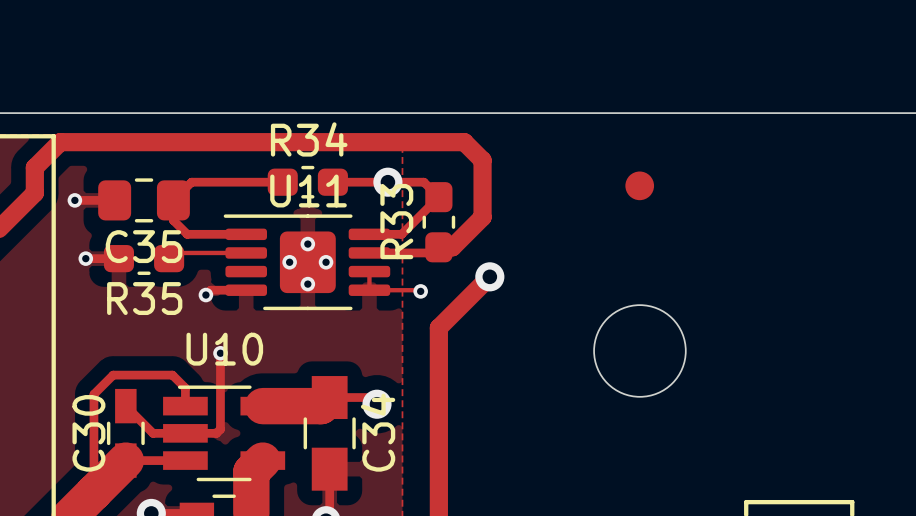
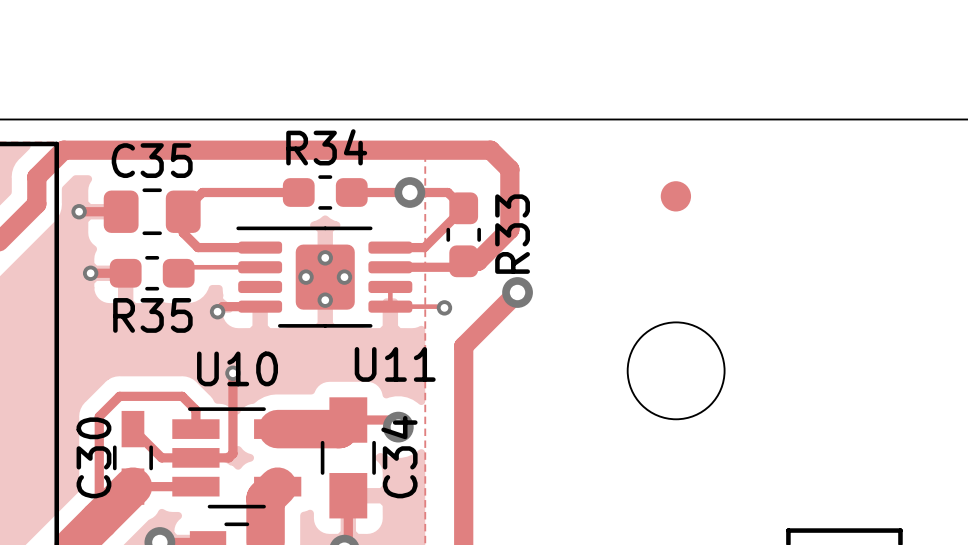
U11 name position: U11 (308, 190) -> U11 (395, 364)
R33 name position: R33 (396, 221) -> R33 (512, 234)
C35 name position: C35 (144, 246) -> C35 (152, 160)

